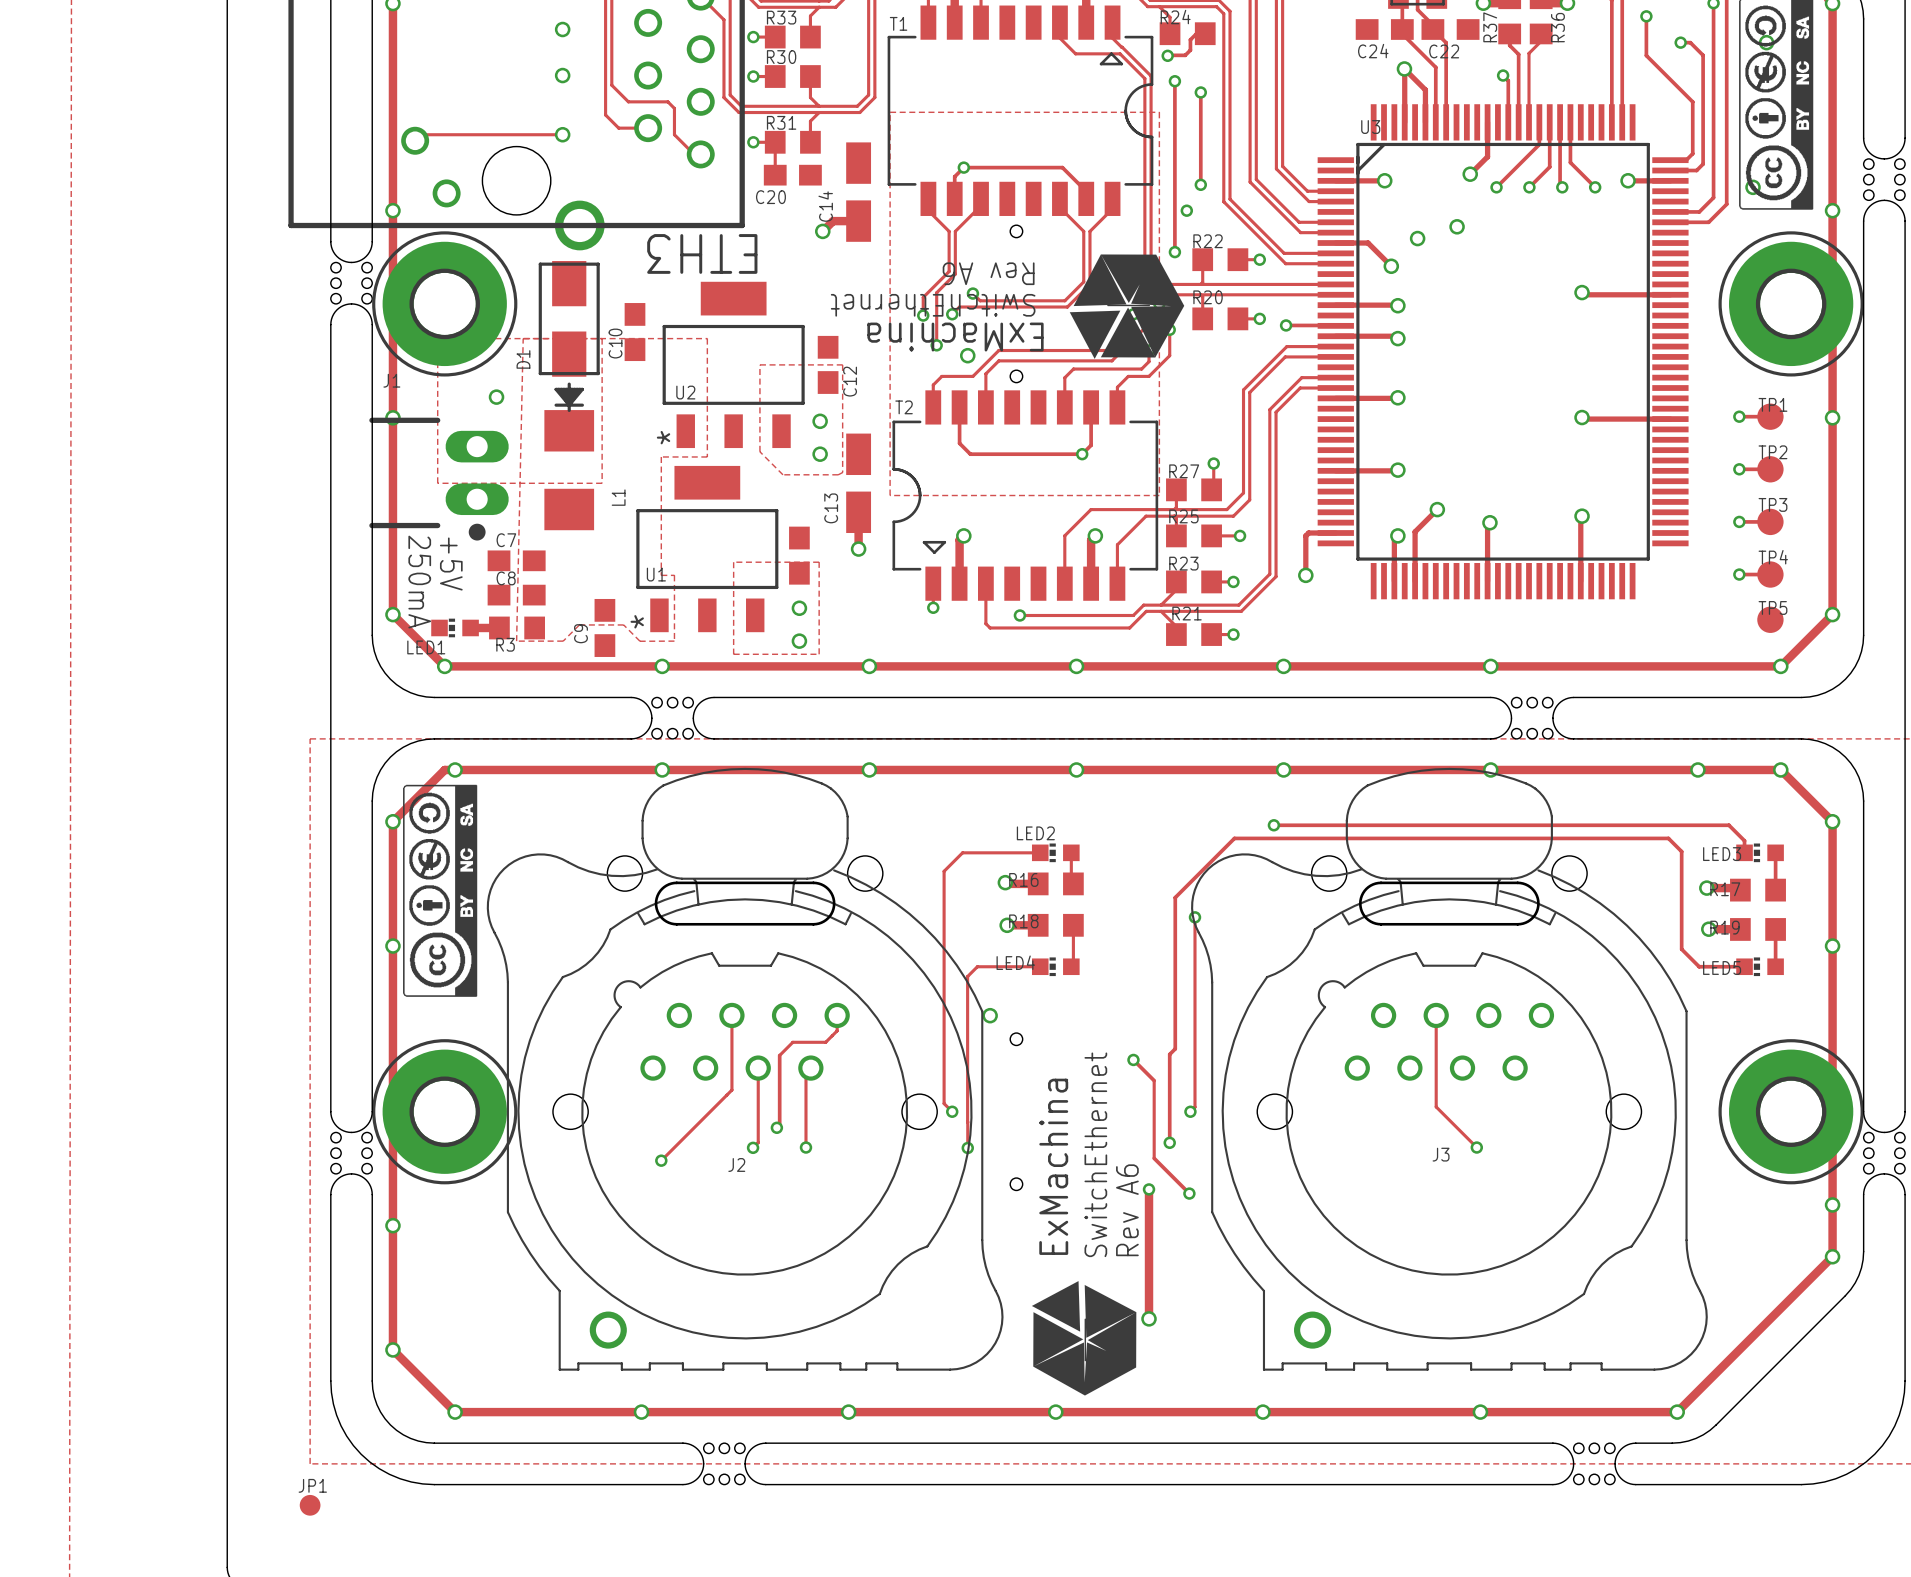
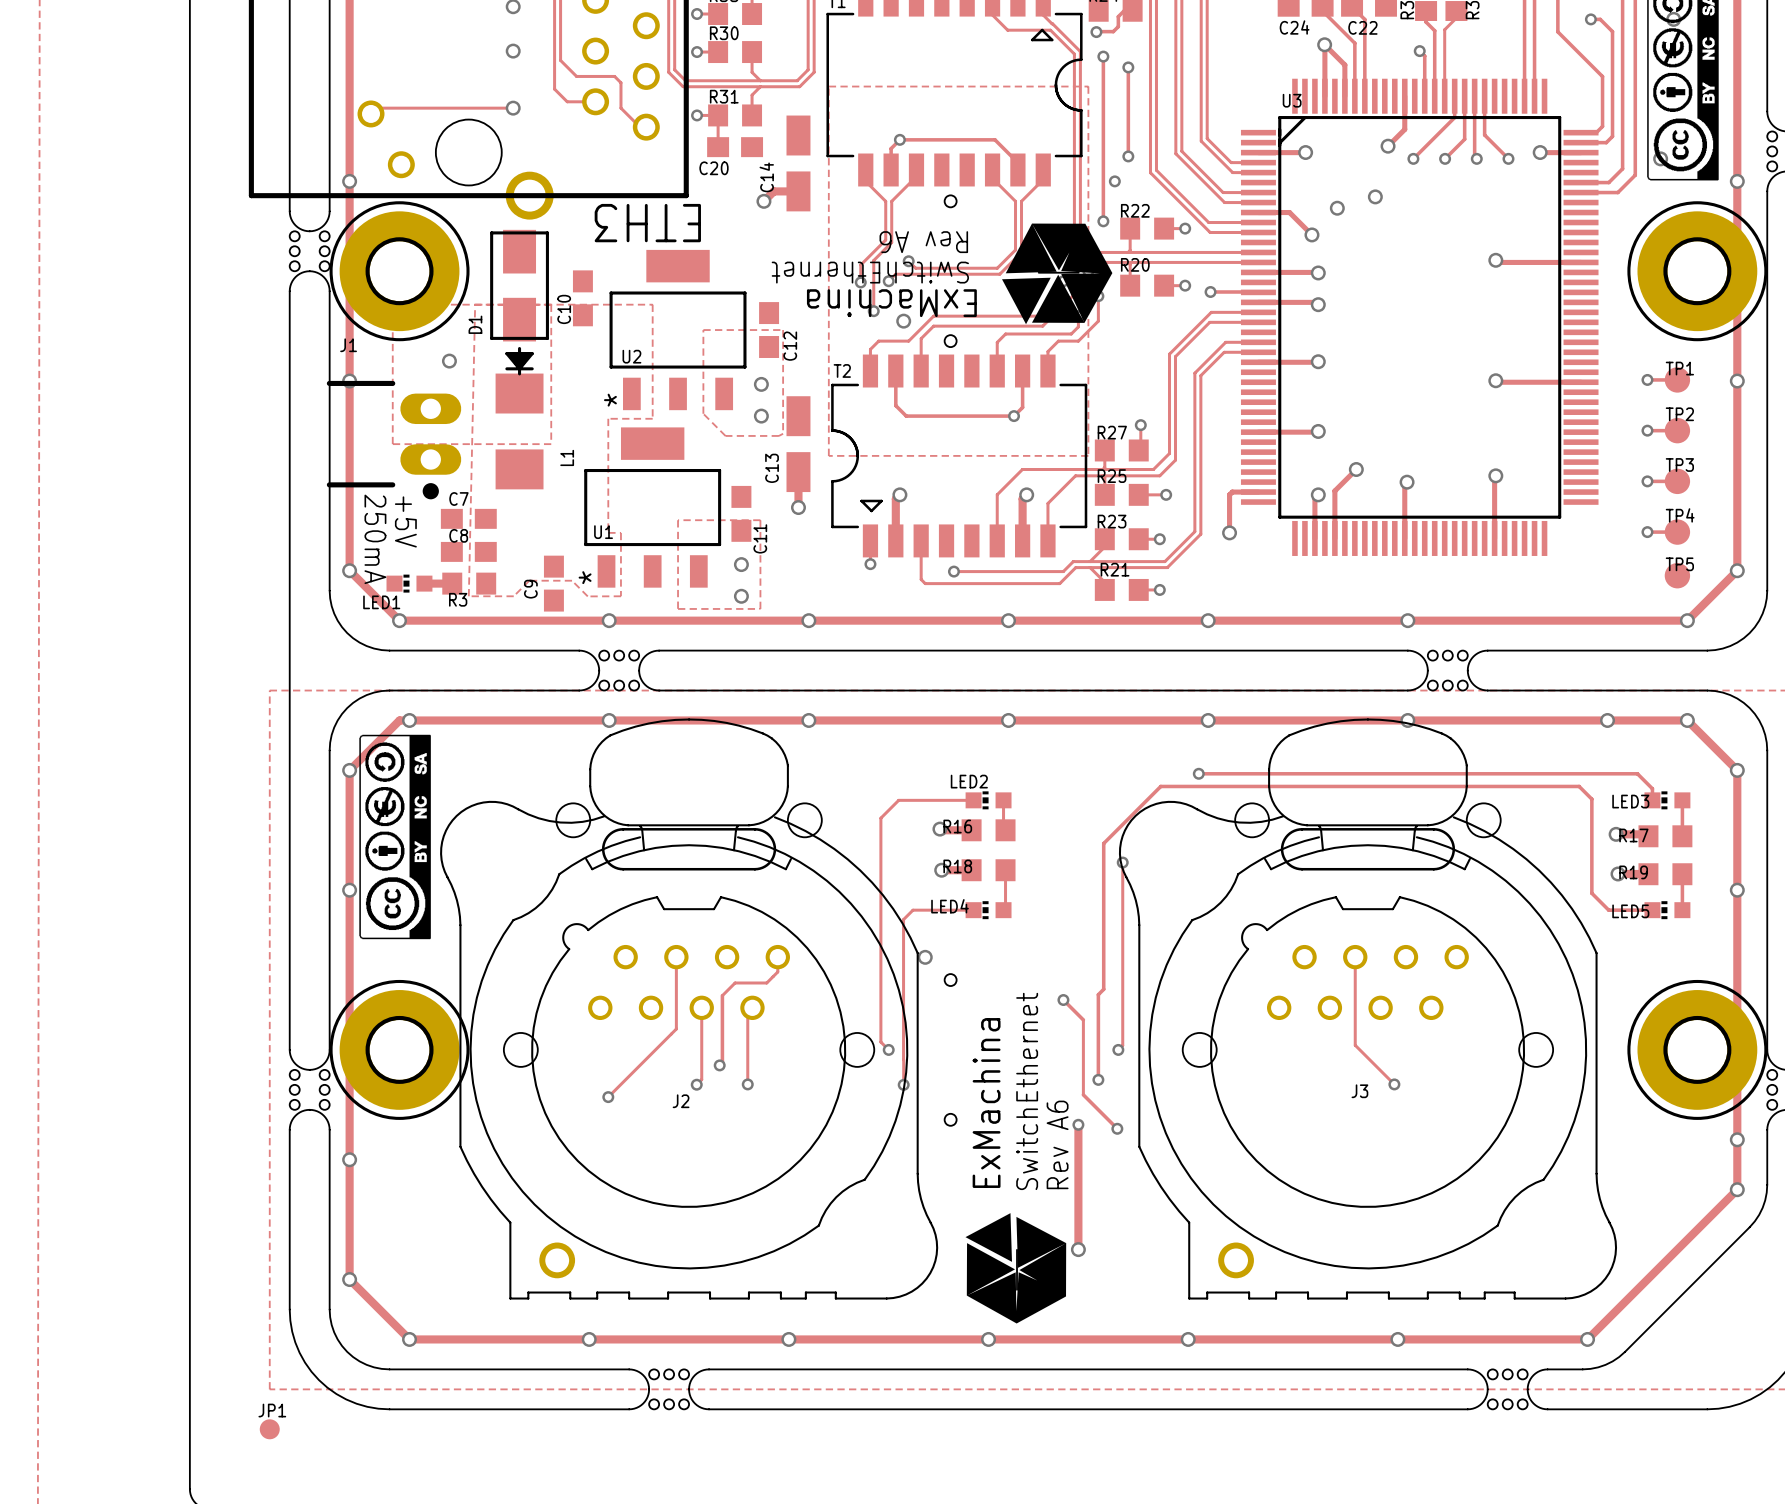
C11 name: none -> C11 (760, 538)

